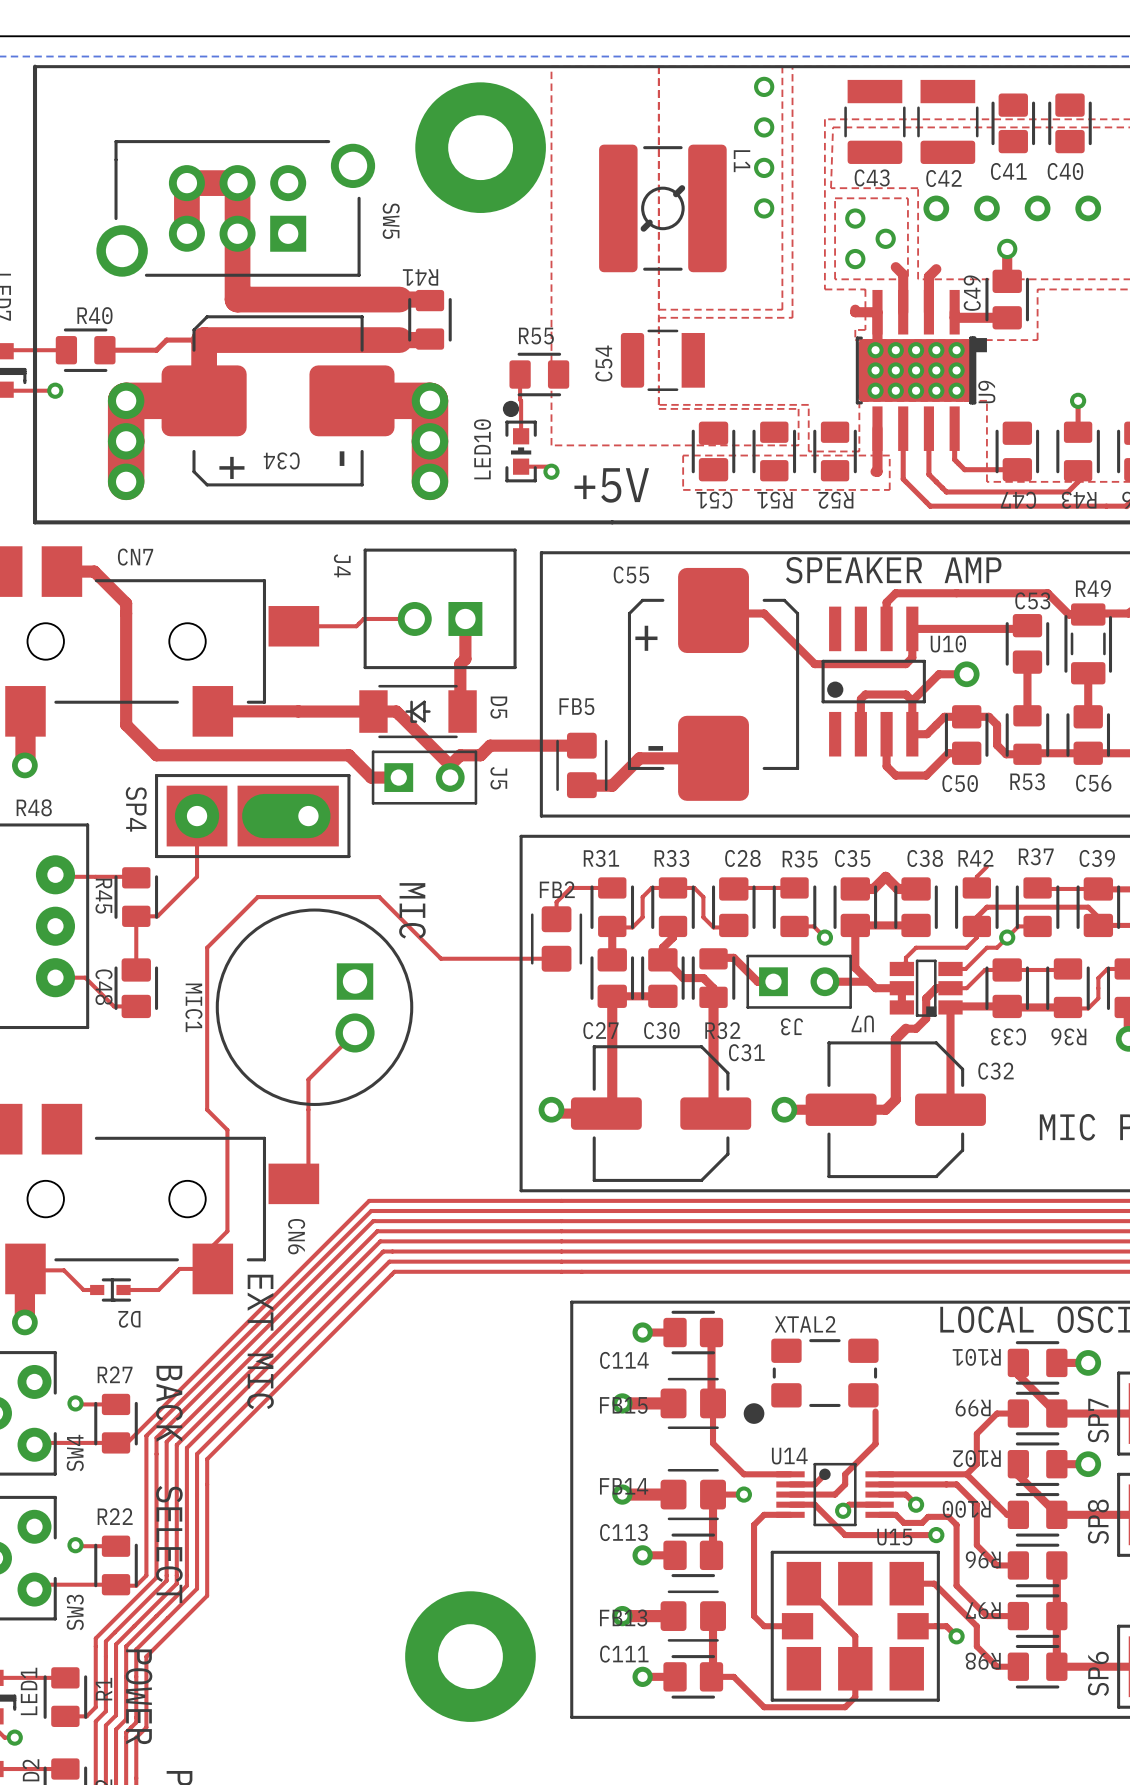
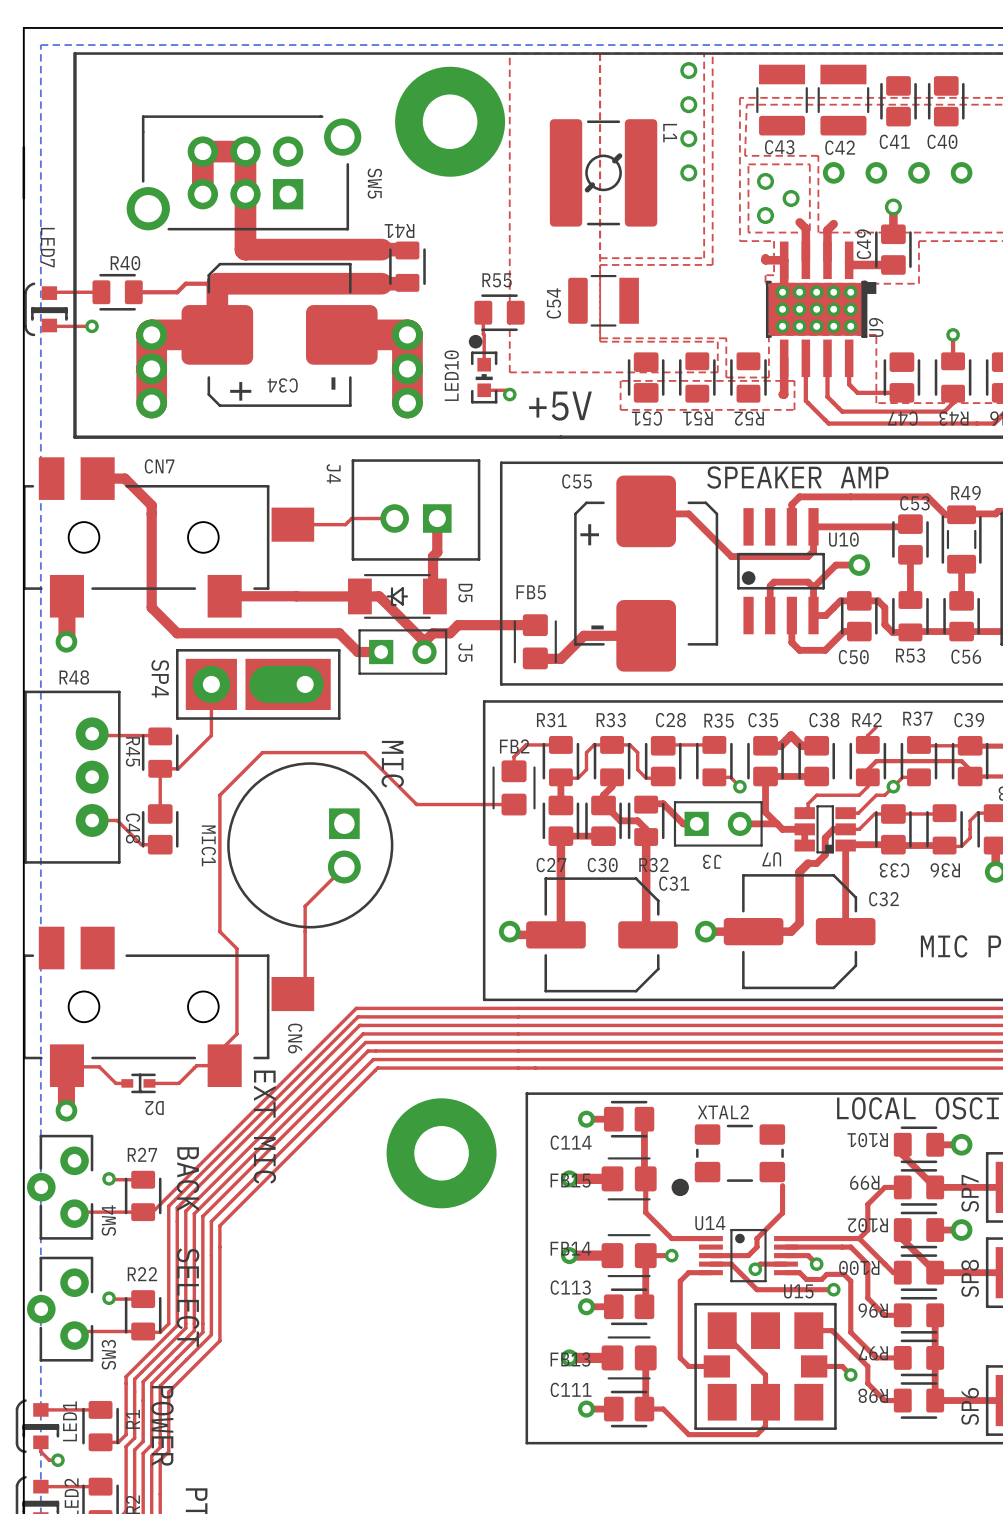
via: none -> (441, 1153)
top track: (822, 1476) (814, 1484) (790, 1484) -> none
via: (470, 1656) -> none

